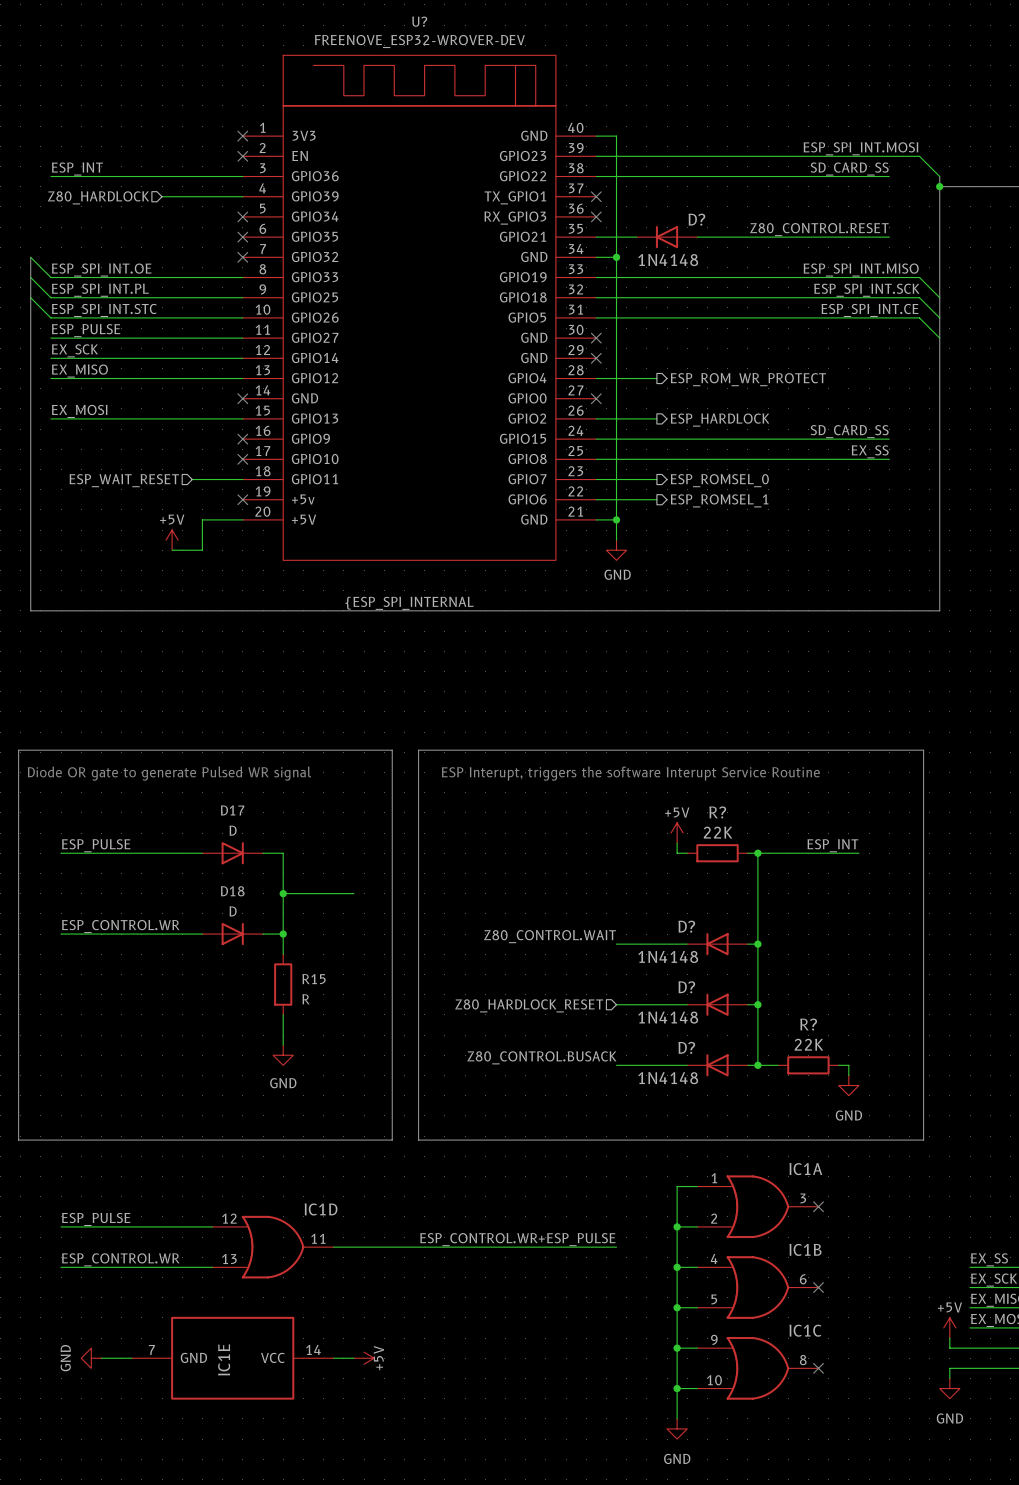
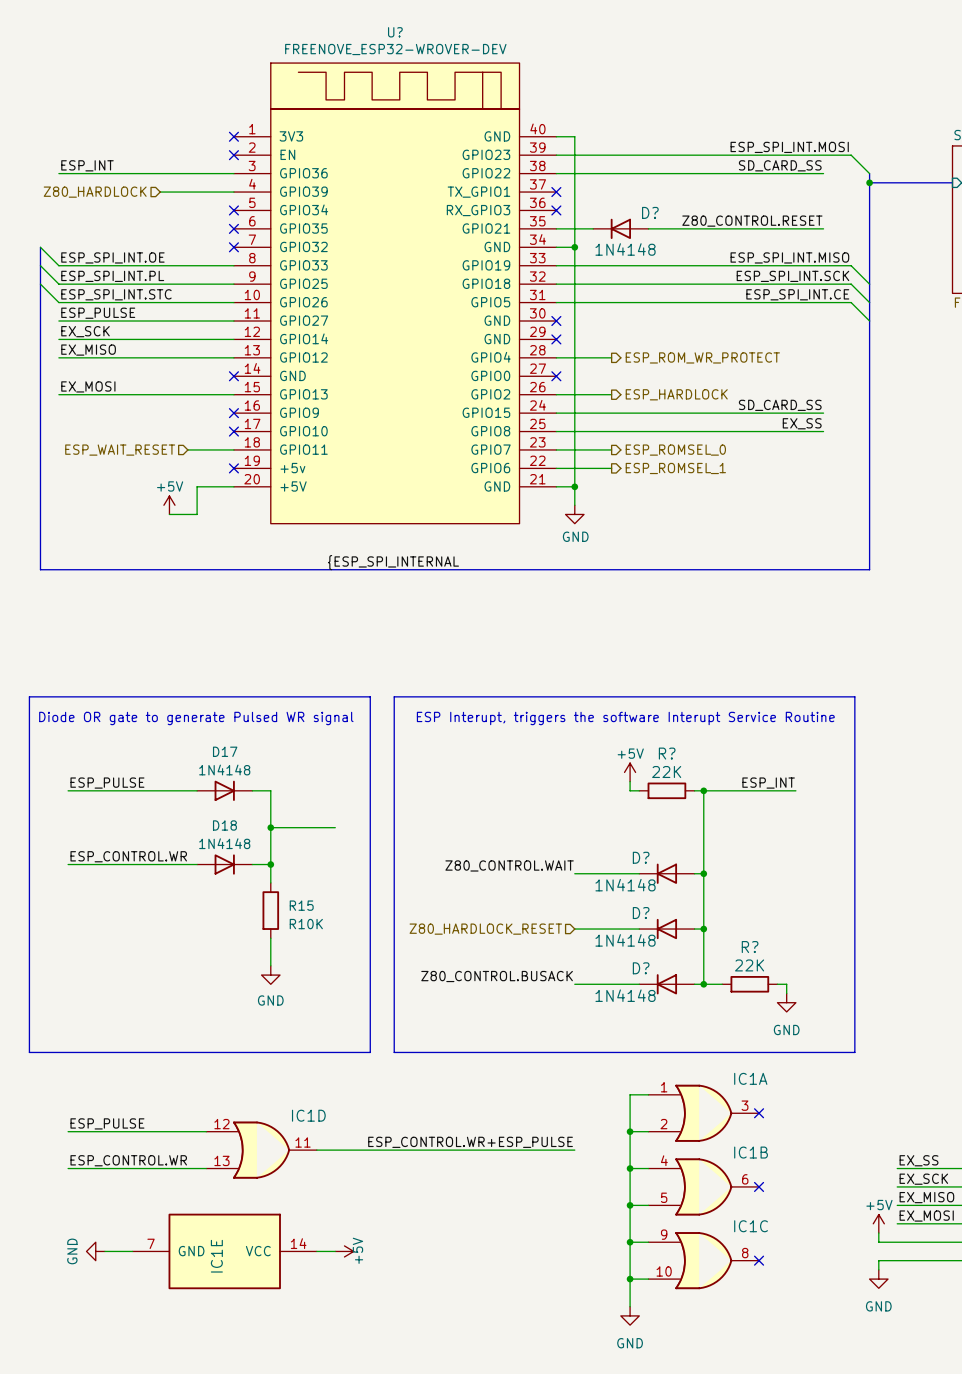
D17 value: D (233, 830) -> 1N4148 (224, 769)
D18 value: D (233, 911) -> 1N4148 (224, 843)
R15 value: R (306, 999) -> R10K (306, 924)

